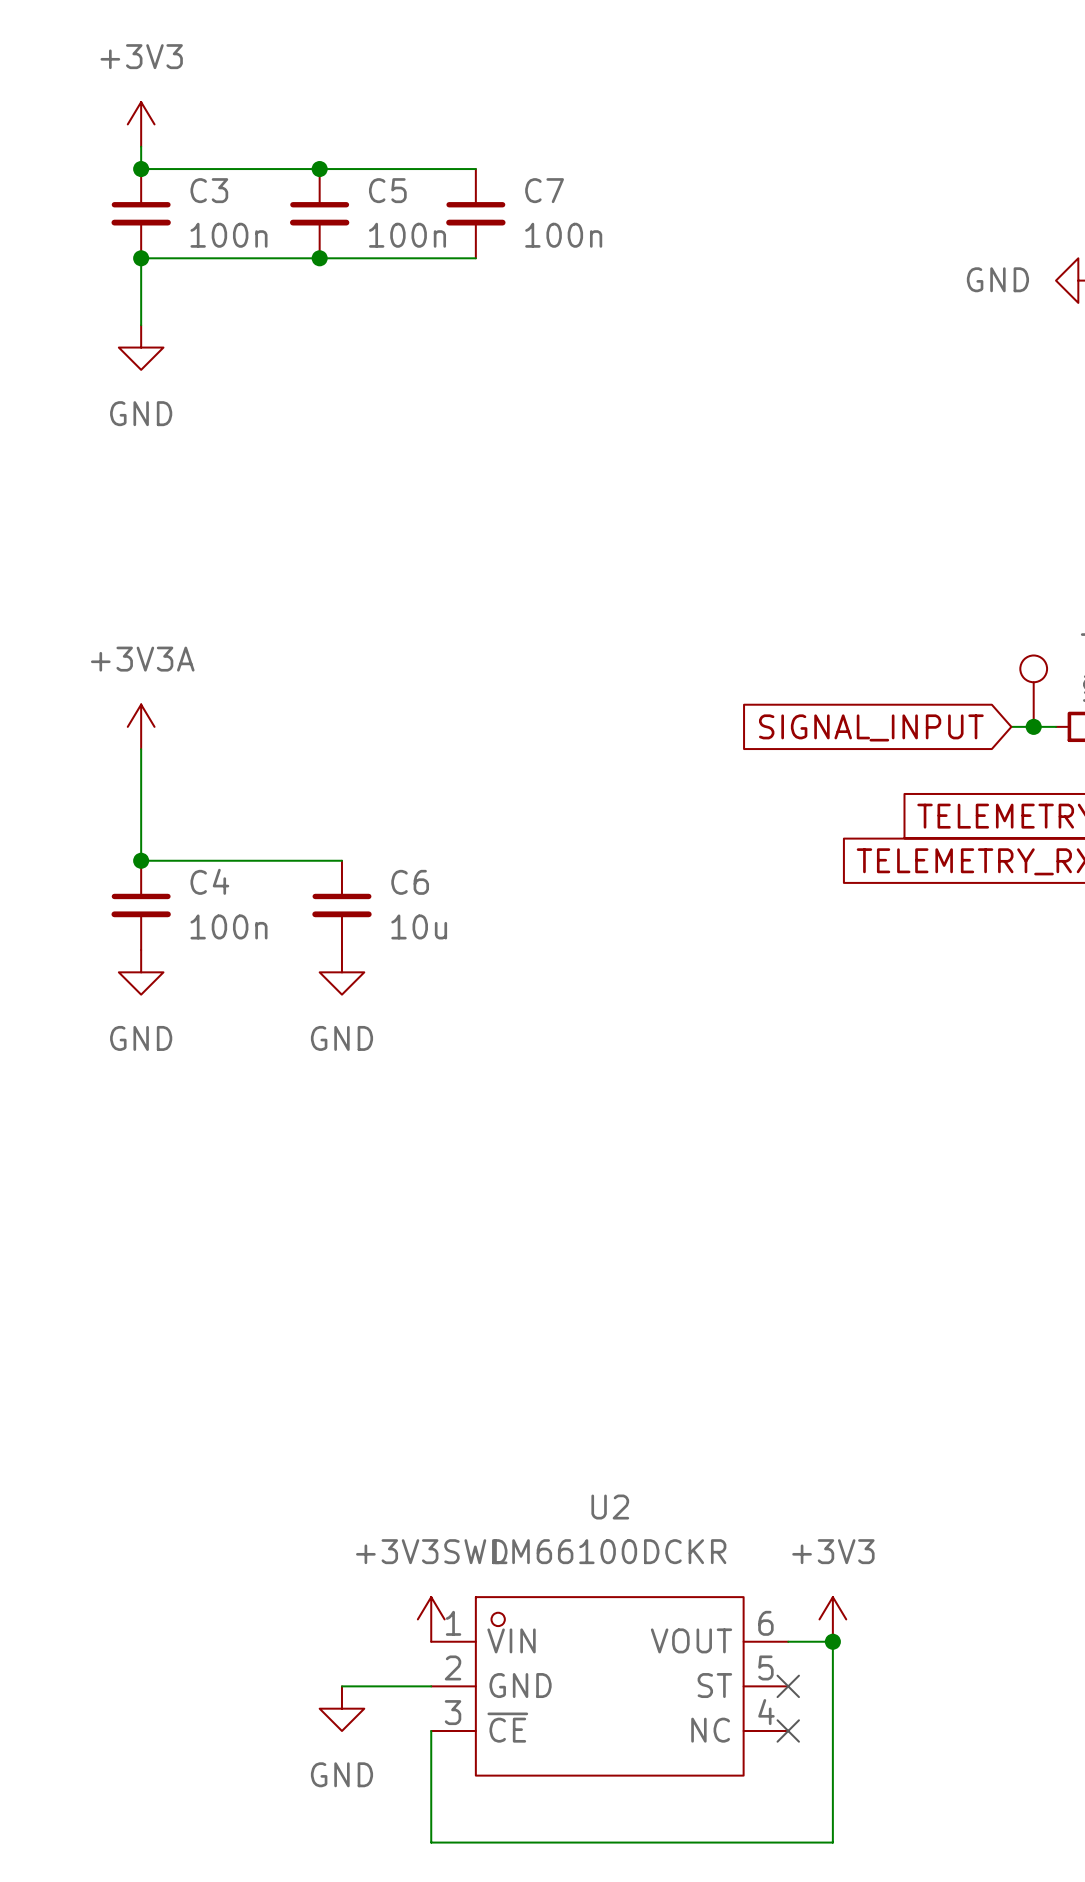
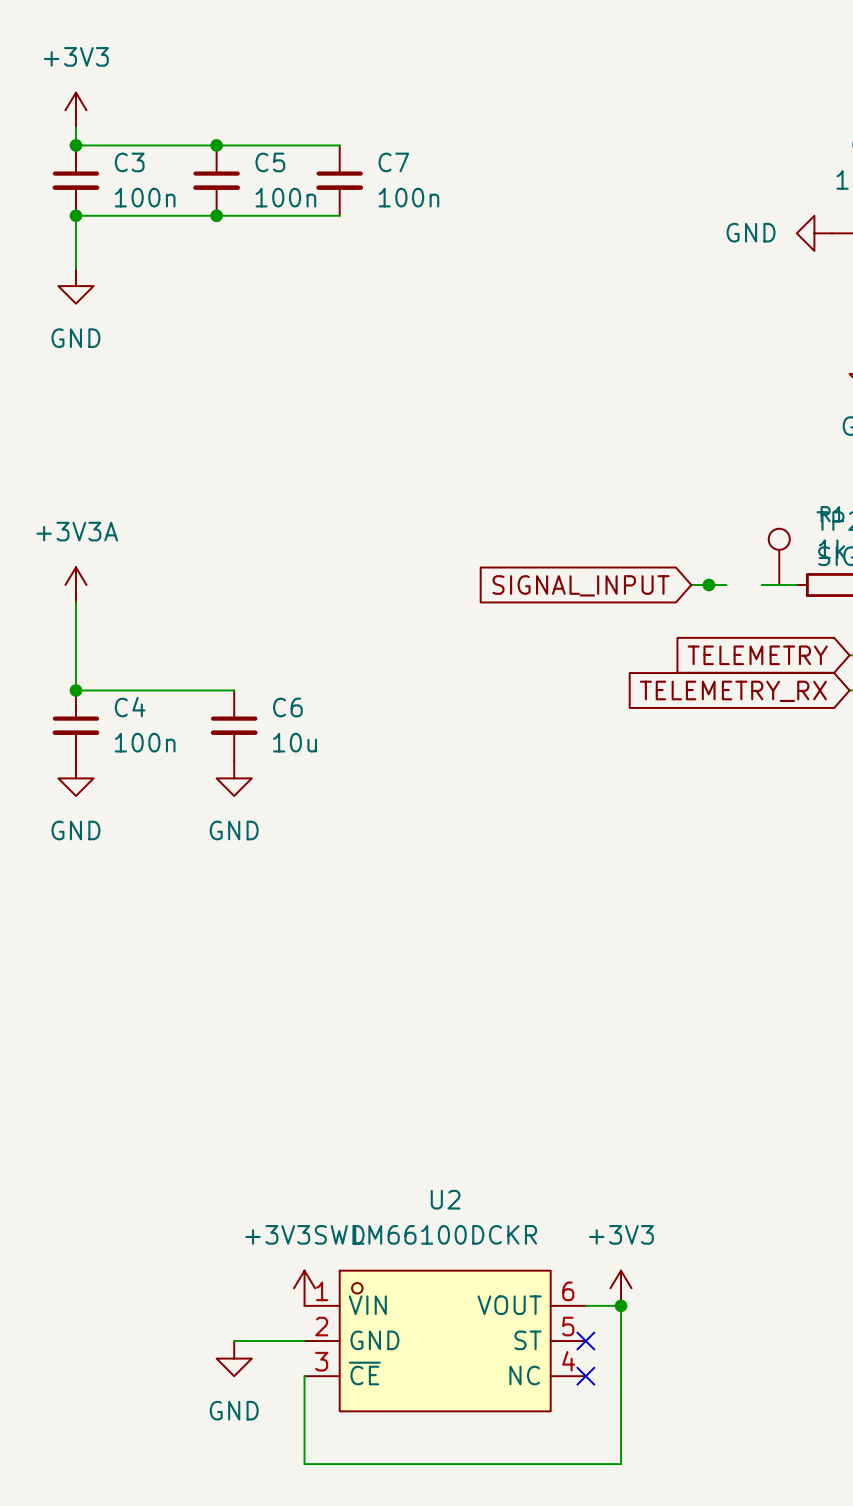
wire: none -> (691, 584) (726, 584)
junction position: (1033, 726) -> (708, 584)
global label position: SIGNAL_INPUT (871, 727) -> SIGNAL_INPUT (581, 585)

